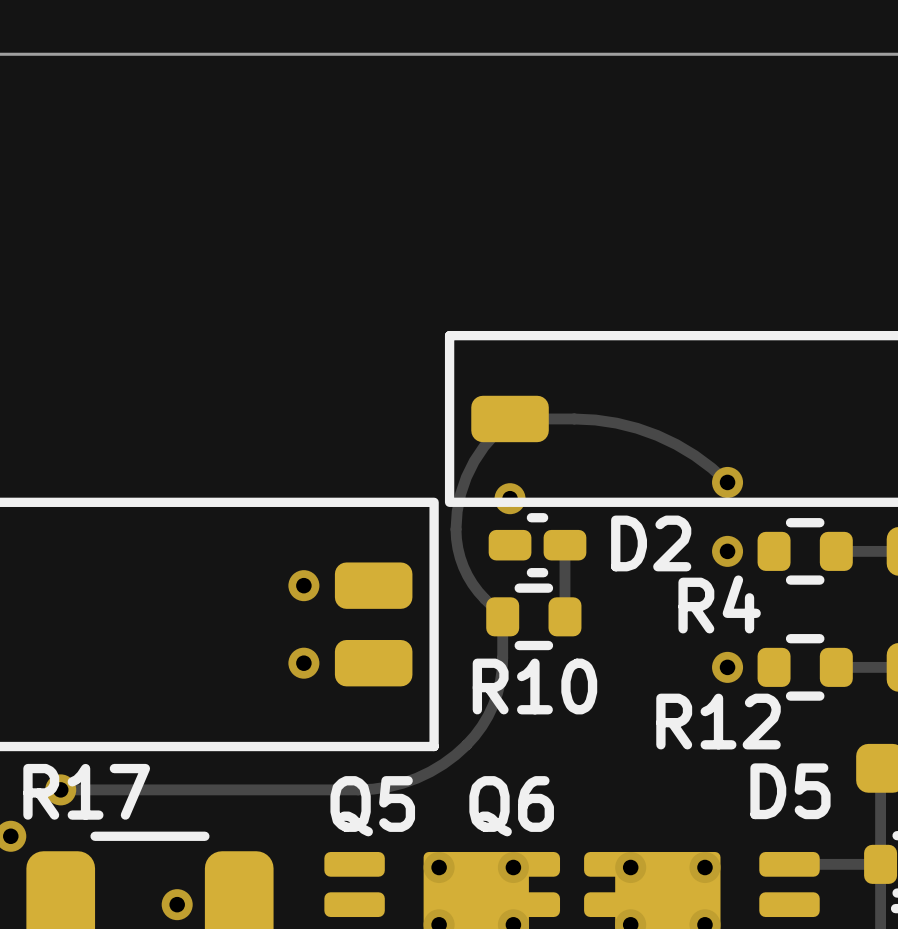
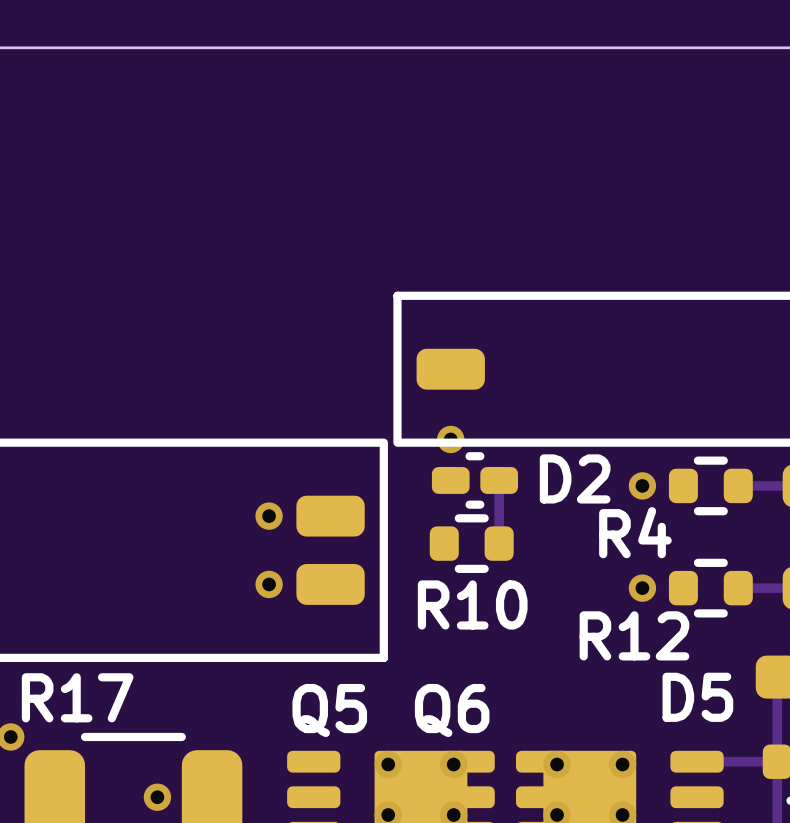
track: (727, 482) (694, 455) (657, 435) (637, 428) (595, 420) (510, 418) (484, 446) (474, 461) (466, 477) (457, 511) (456, 538) (463, 567) (478, 591) (502, 616) (502, 657) (500, 681) (488, 715) (474, 736) (455, 755) (416, 778) (373, 789) (60, 789) -> none
via: (727, 482) -> none
via: (60, 789) -> none

